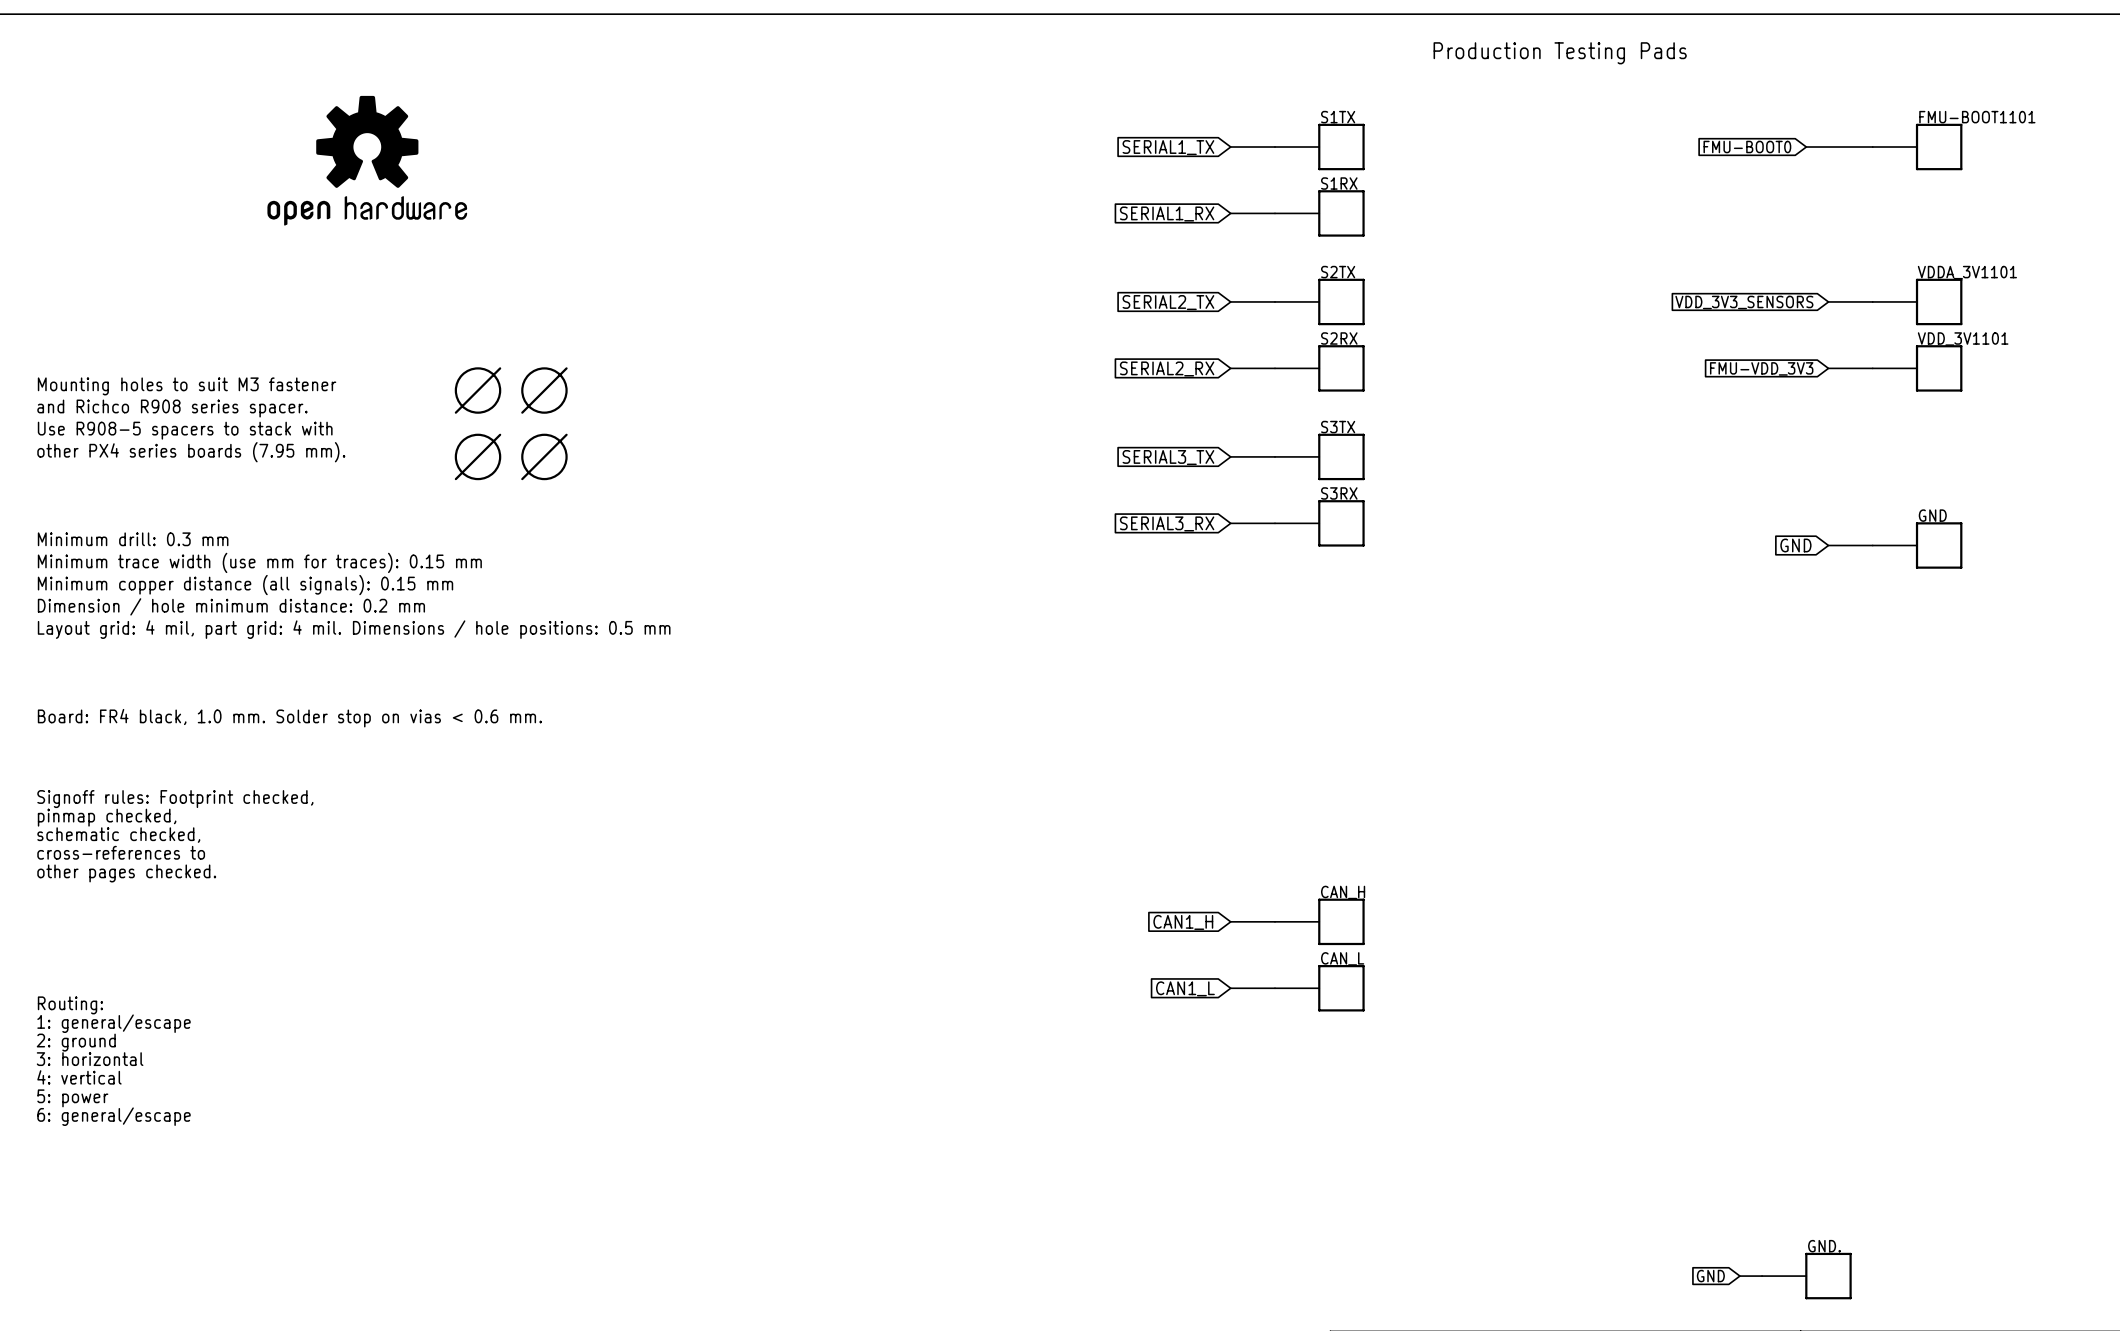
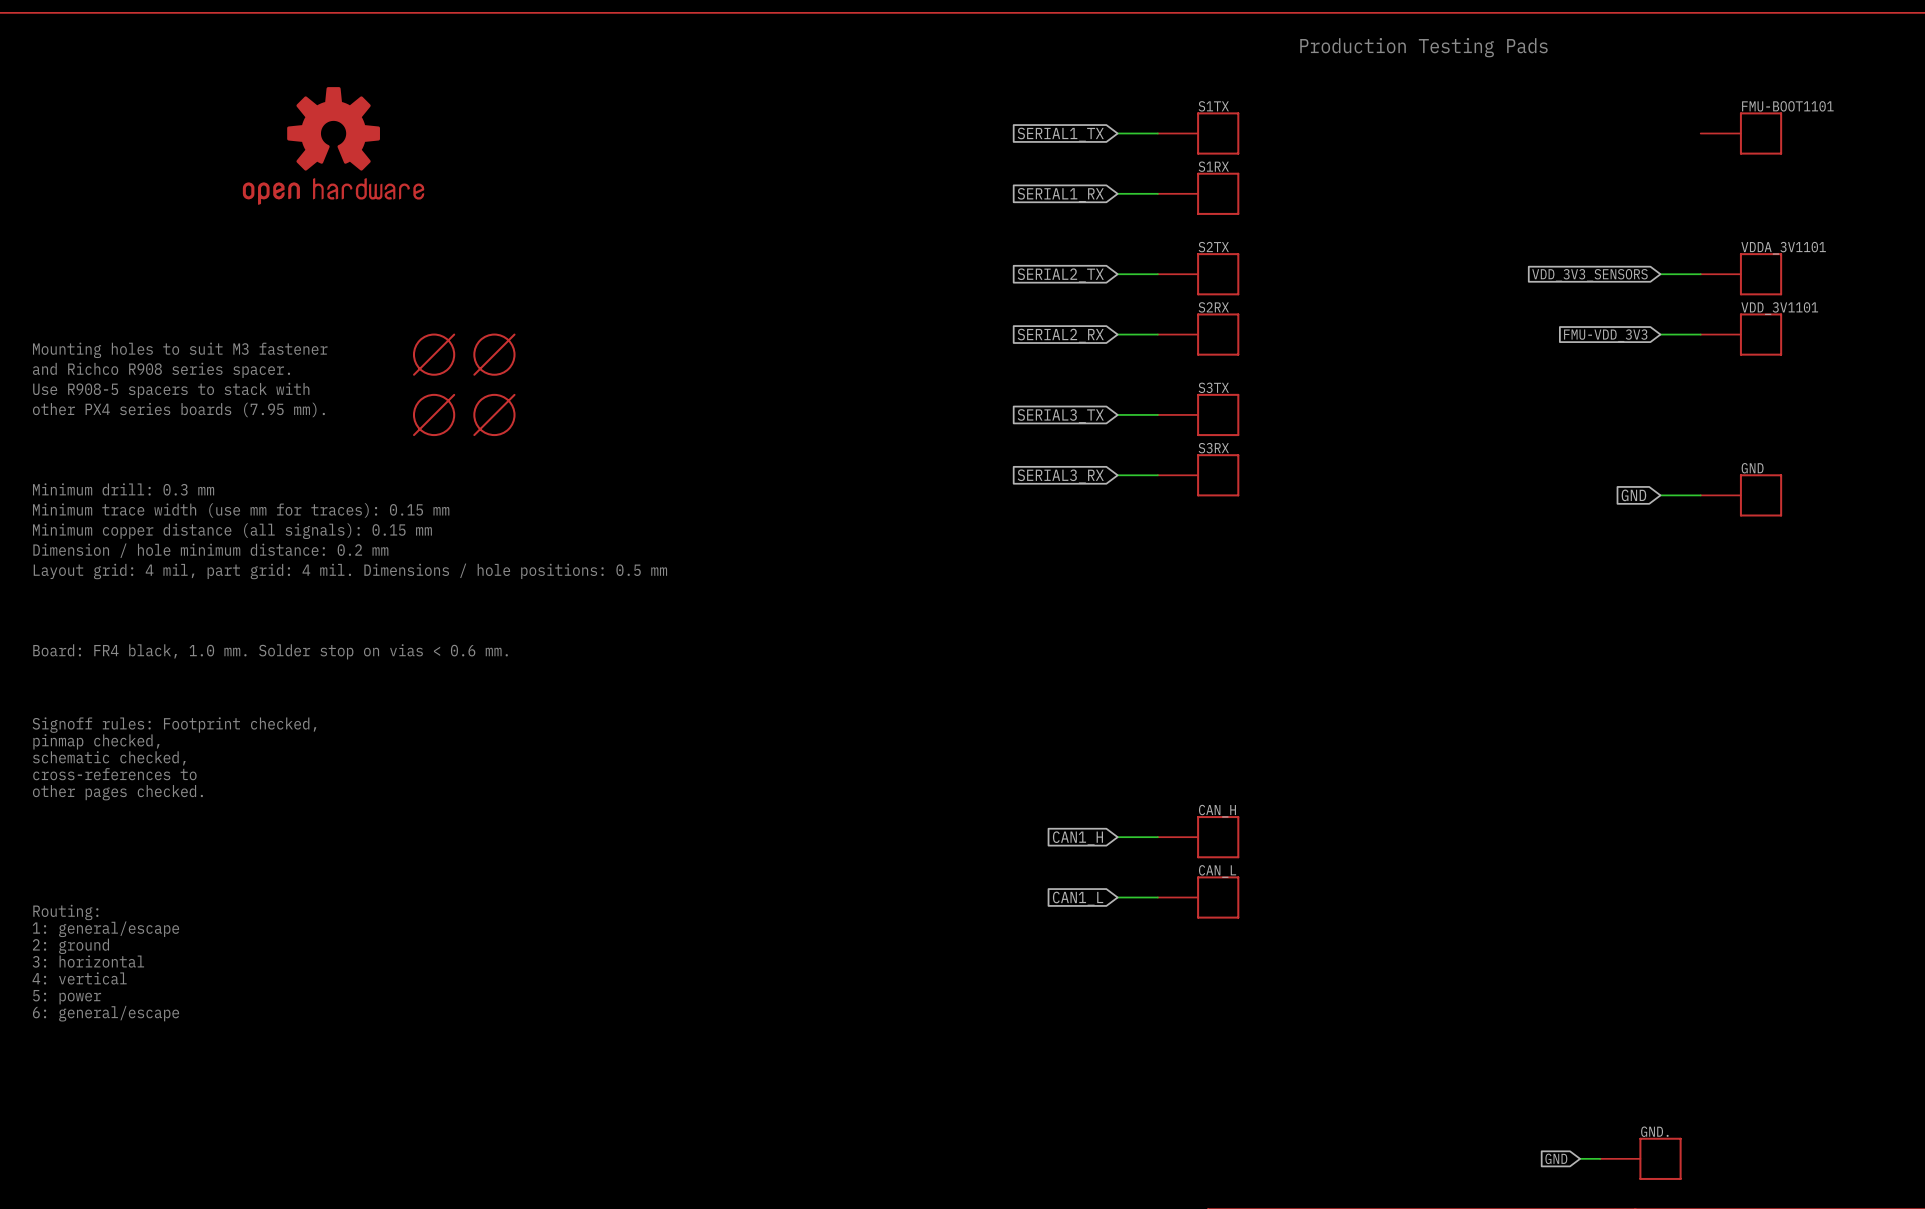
global label: FMU-BOOT0 (1747, 147) -> none
wire: (1806, 147) (1872, 147) -> none

